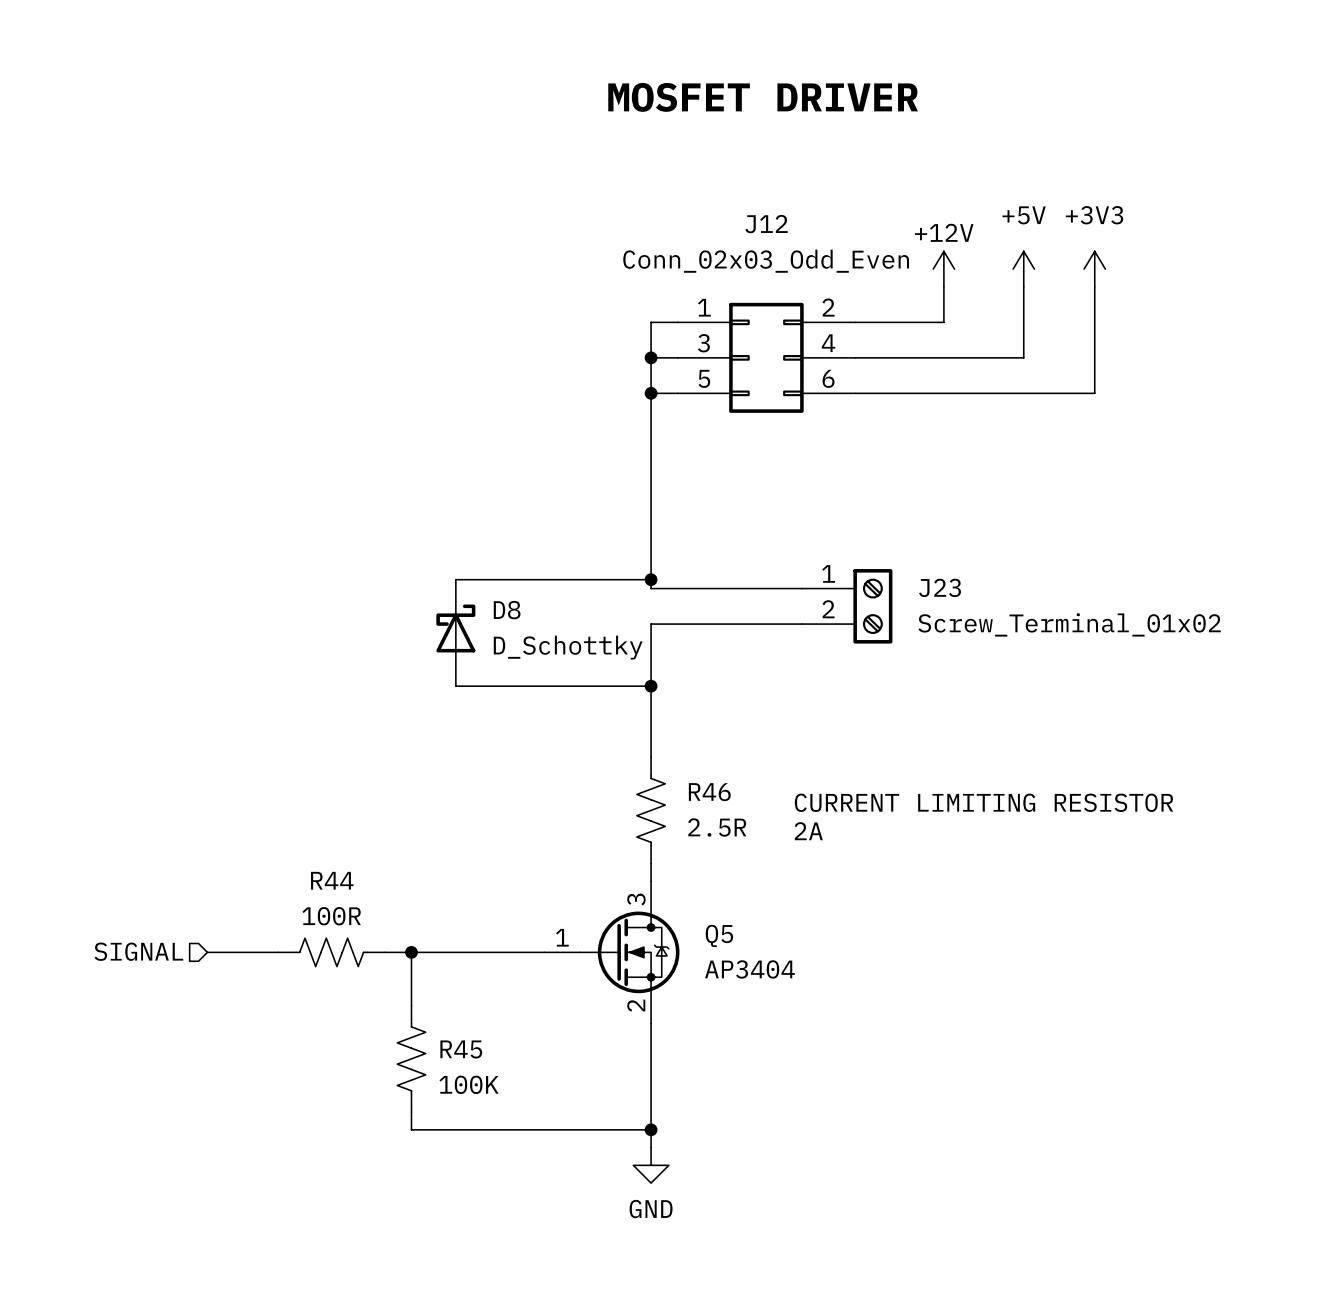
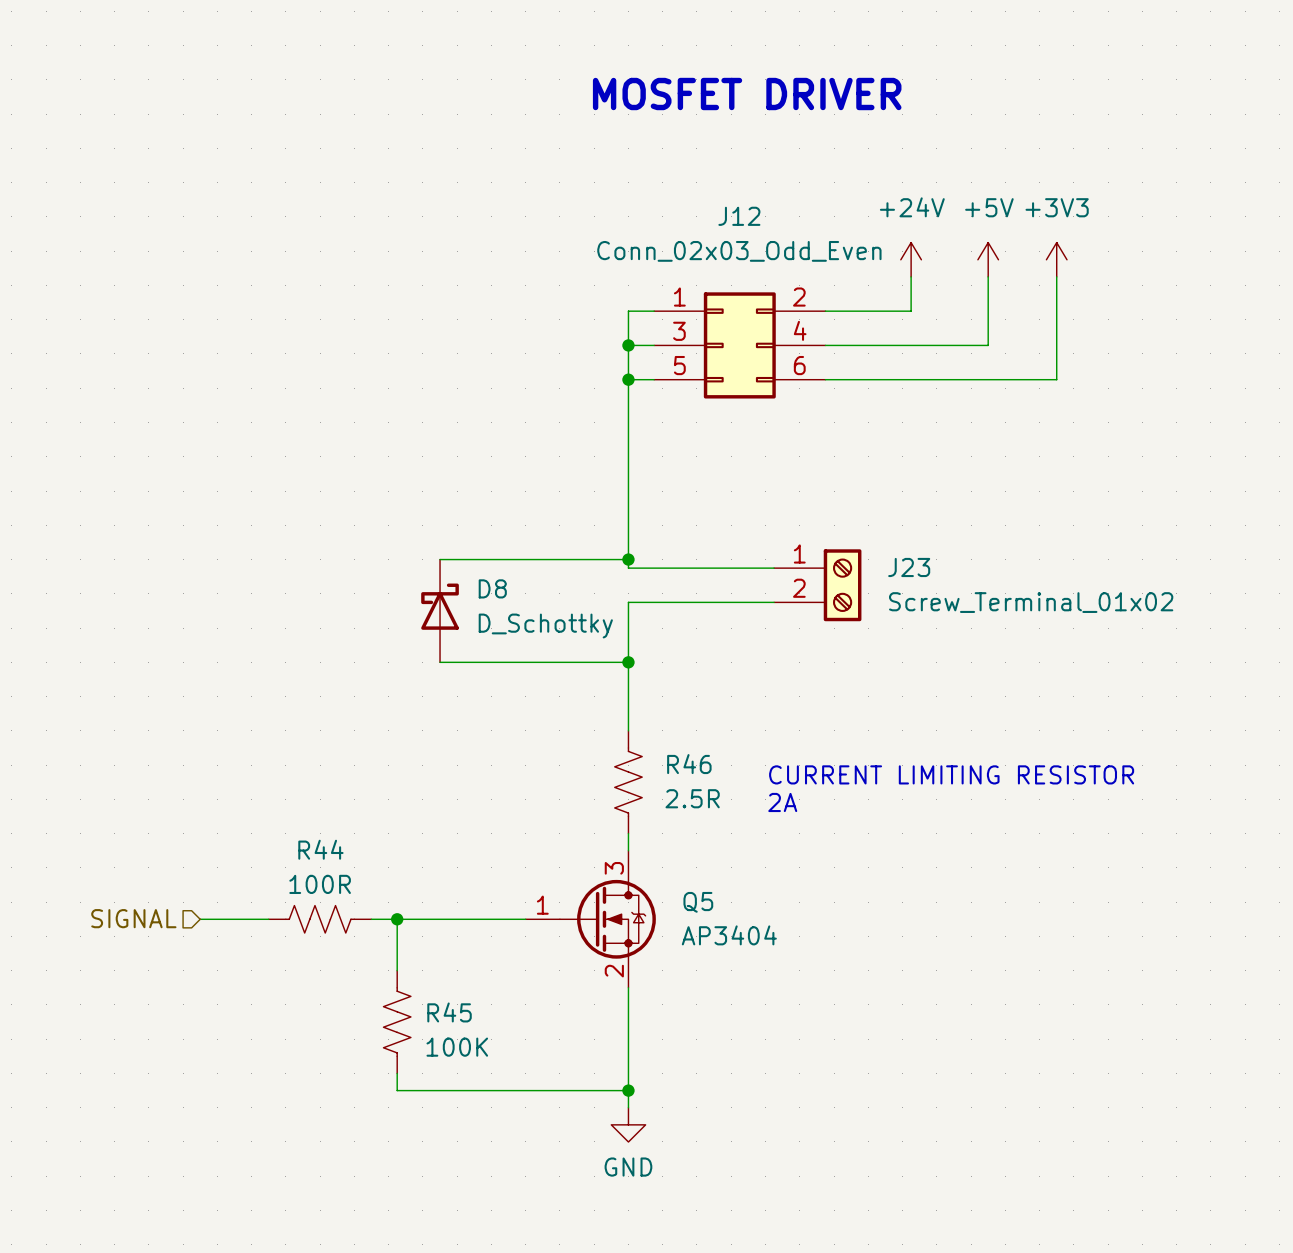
power symbol: +12V (943, 269) -> +24V (911, 259)

